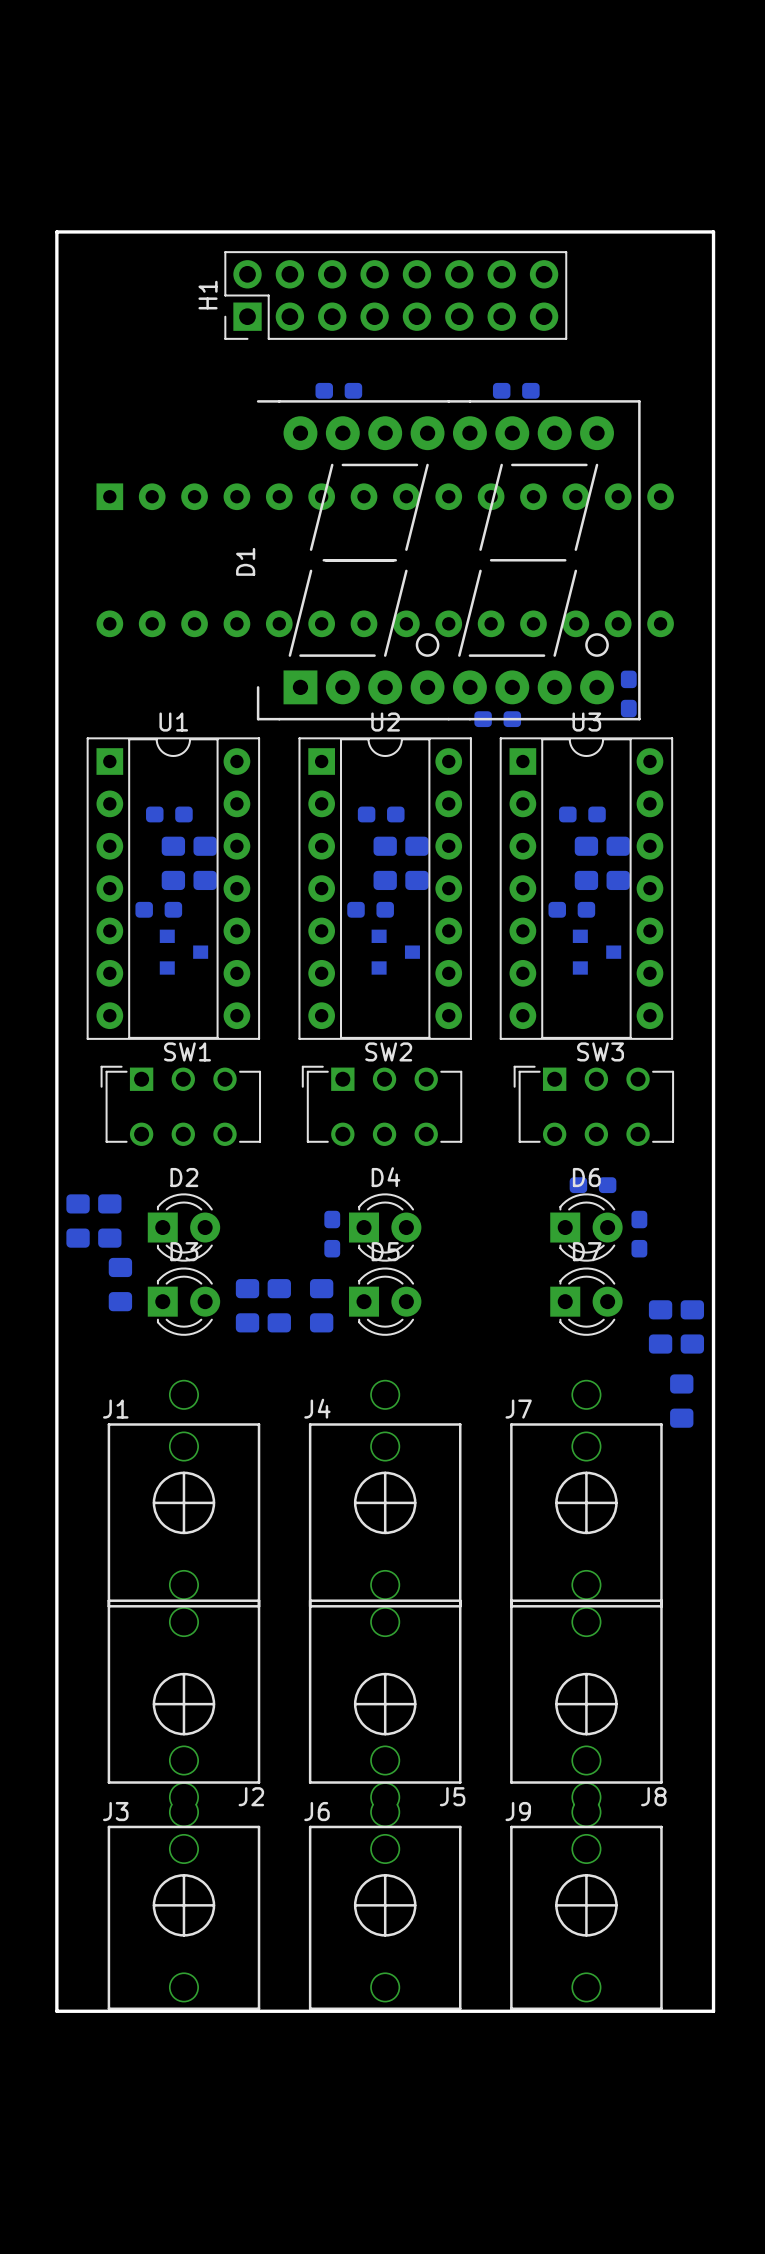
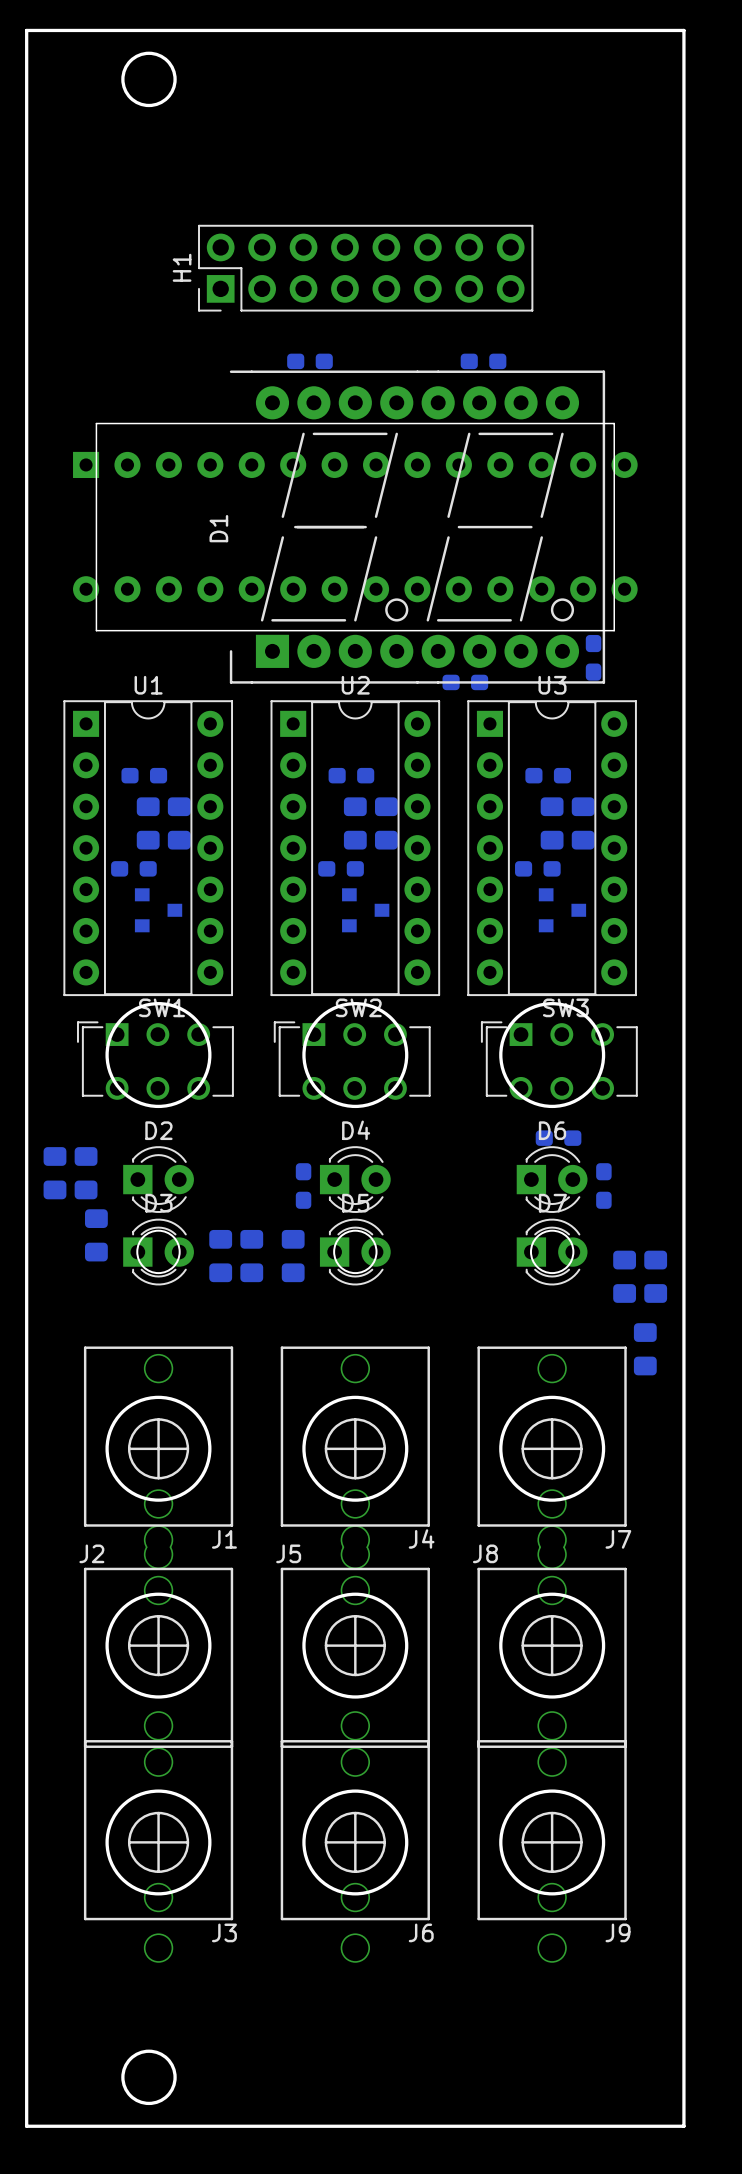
round board edge: none -> [121, 51, 177, 108]
board edge: (56, 231) (713, 231) (713, 2011) (56, 2011) (56, 231) -> (26, 30) (26, 2126) (683, 2126) (683, 30) (26, 30)
board edge: none -> (96, 423) (614, 423) (614, 630) (96, 630) (96, 423)
round board edge: none -> [105, 1002, 212, 1109]
round board edge: none -> [302, 1002, 409, 1109]
round board edge: none -> [499, 1002, 606, 1109]
round board edge: none -> [136, 1229, 181, 1275]
round board edge: none -> [333, 1229, 378, 1275]
round board edge: none -> [530, 1229, 575, 1275]
round board edge: none -> [105, 1395, 212, 1502]
round board edge: none -> [302, 1395, 409, 1502]
round board edge: none -> [499, 1395, 606, 1502]
J1 rotation: 0° (183, 1493) -> 180° (158, 1457)
J4 rotation: 0° (385, 1493) -> 180° (355, 1457)
J7 rotation: 0° (586, 1493) -> 180° (552, 1457)
round board edge: none -> [105, 1592, 212, 1699]
round board edge: none -> [302, 1592, 409, 1699]
round board edge: none -> [499, 1592, 606, 1699]
J2 rotation: 0° (183, 1713) -> 180° (158, 1636)
J5 rotation: 0° (385, 1713) -> 180° (355, 1636)
J8 rotation: 0° (586, 1713) -> 180° (552, 1636)
round board edge: none -> [105, 1789, 212, 1896]
round board edge: none -> [302, 1789, 409, 1896]
round board edge: none -> [499, 1789, 606, 1896]
J3 rotation: 0° (183, 1896) -> 180° (158, 1851)
J6 rotation: 0° (385, 1896) -> 180° (355, 1851)
J9 rotation: 0° (586, 1896) -> 180° (552, 1851)
round board edge: none -> [121, 2049, 177, 2106]

